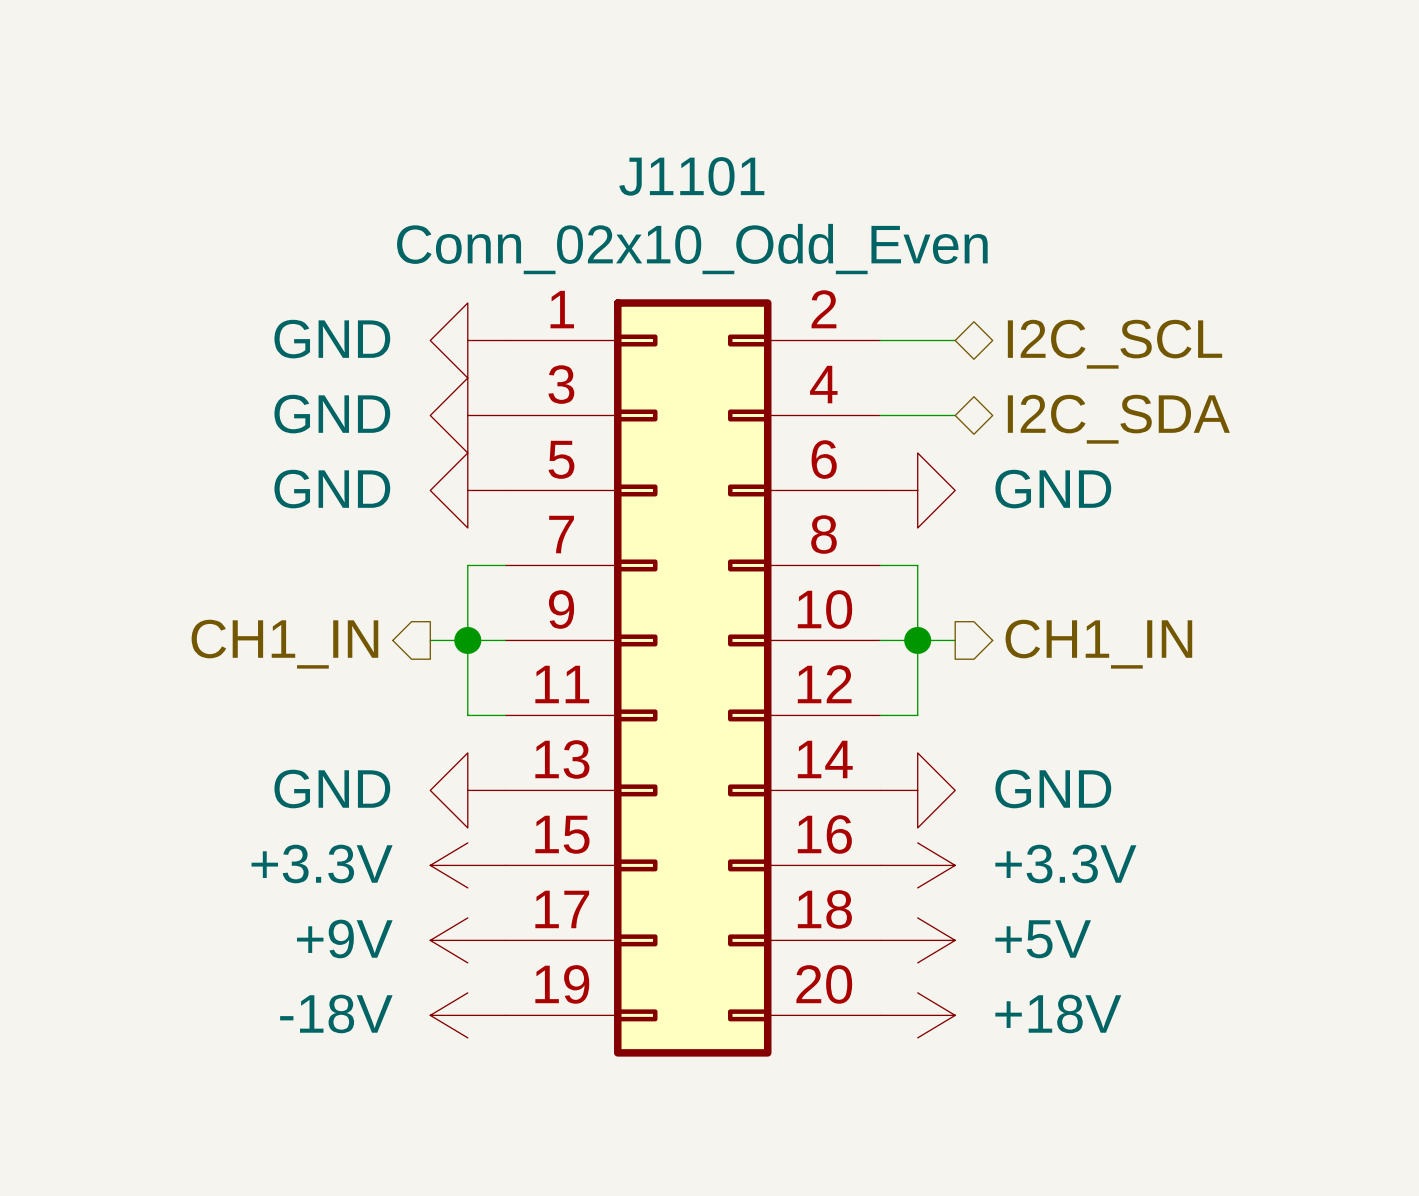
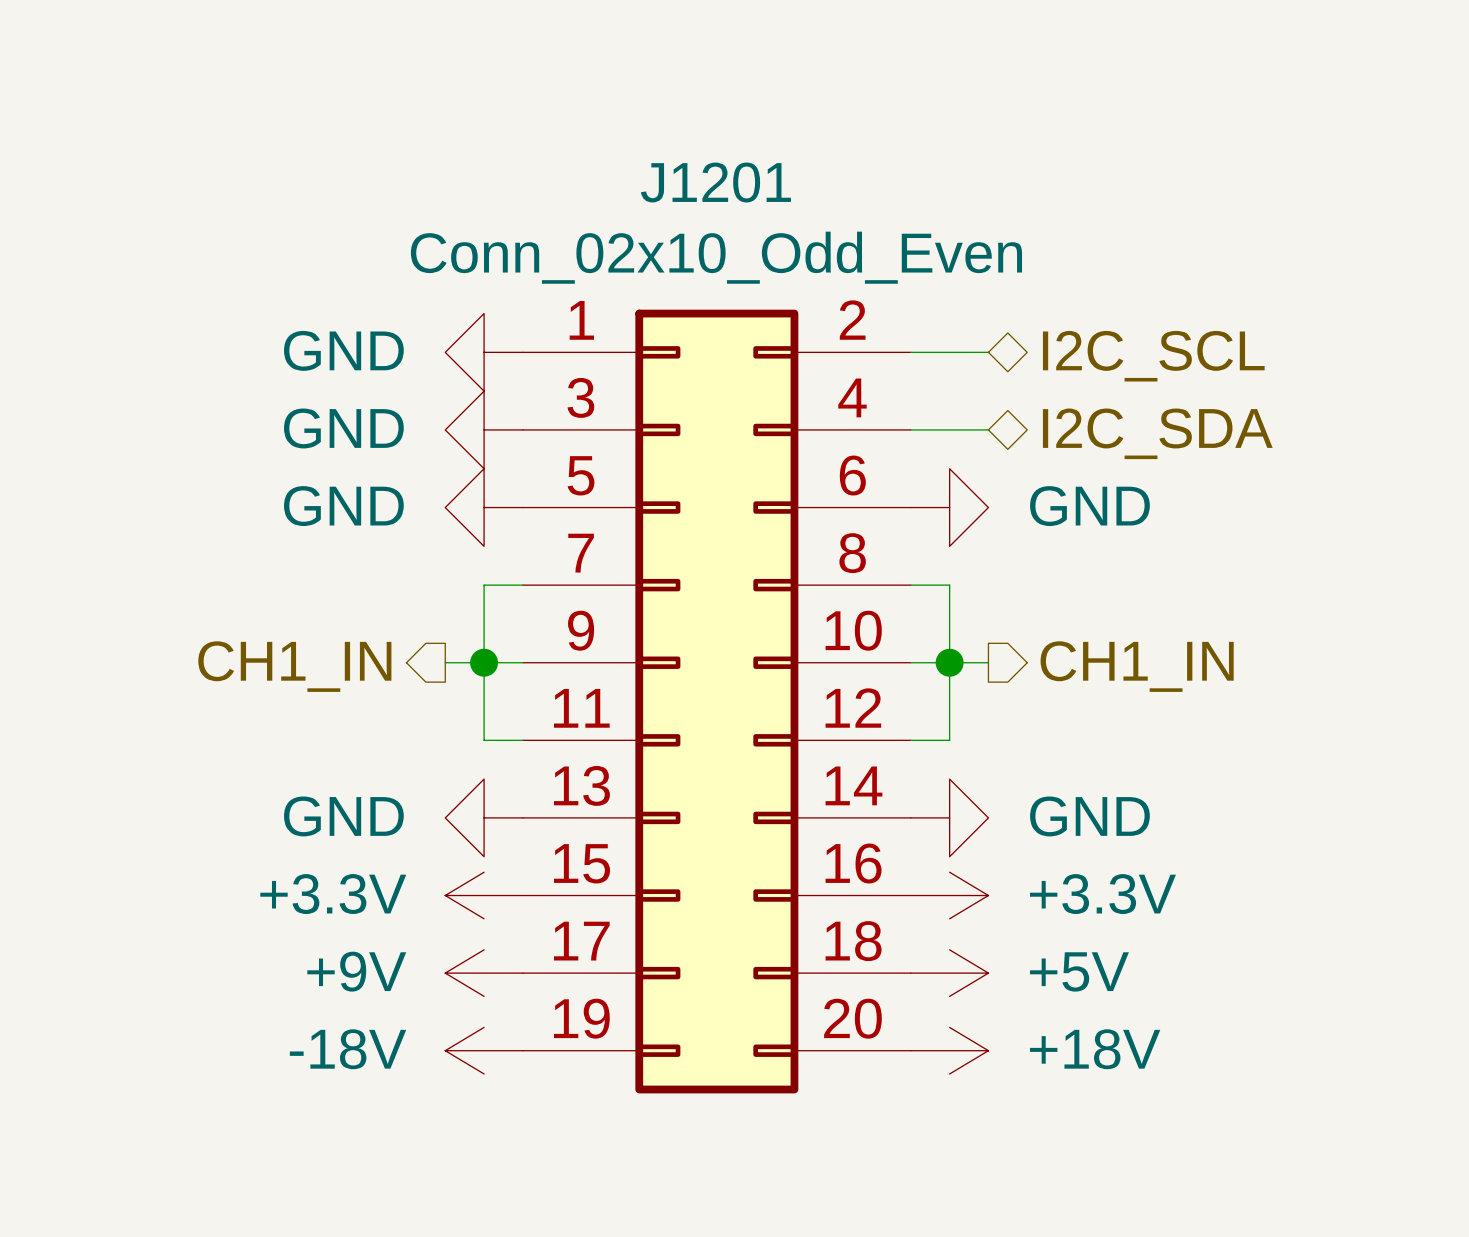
J1101 name: J1101 (691, 176) -> J1201 (715, 182)

